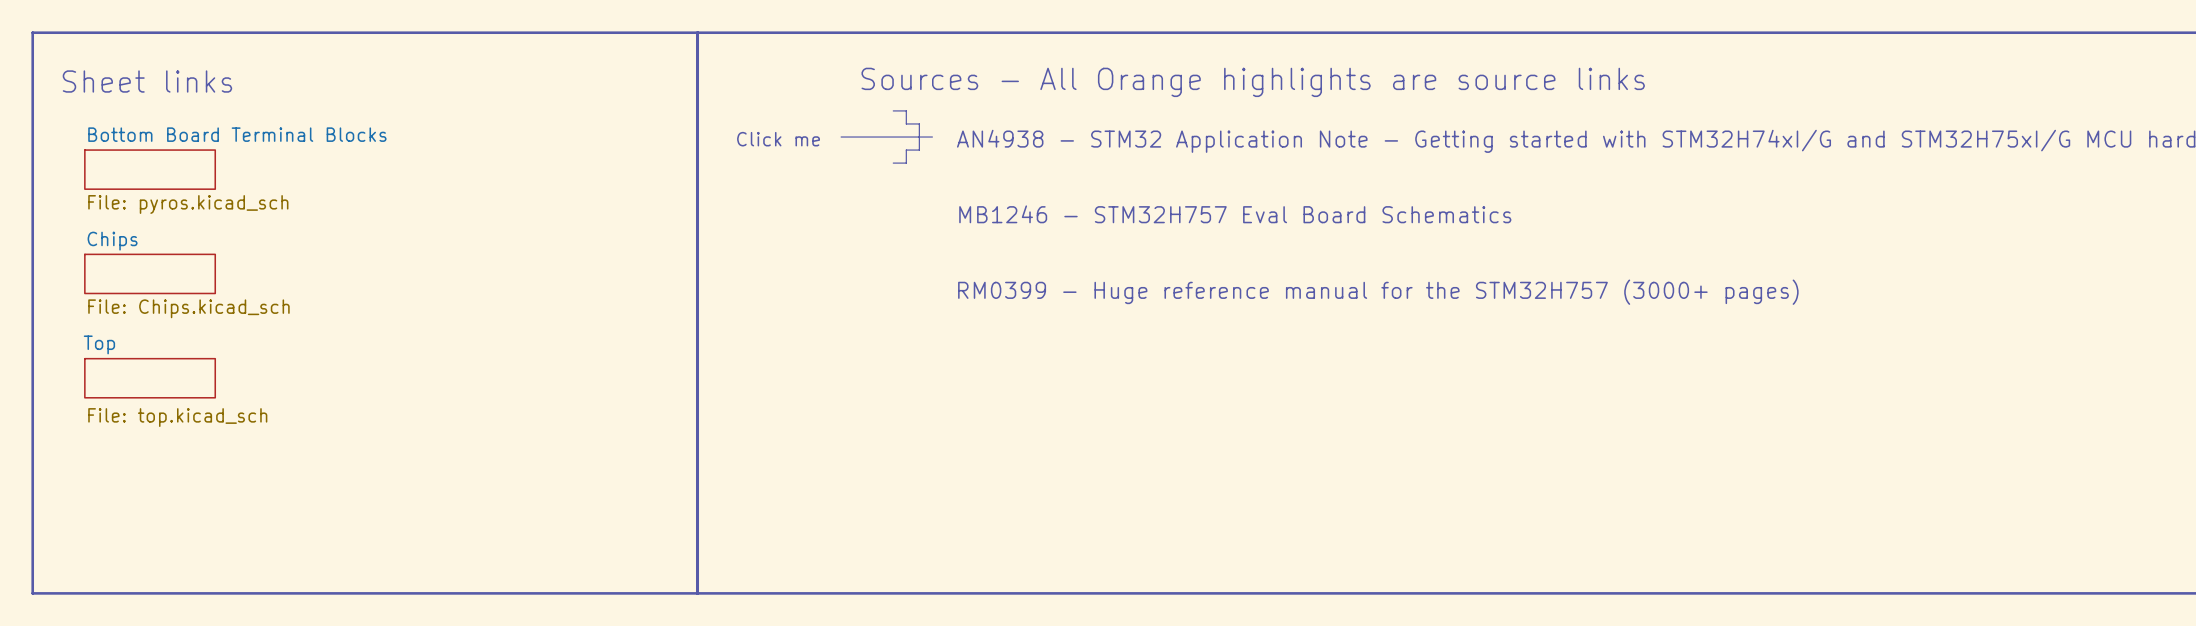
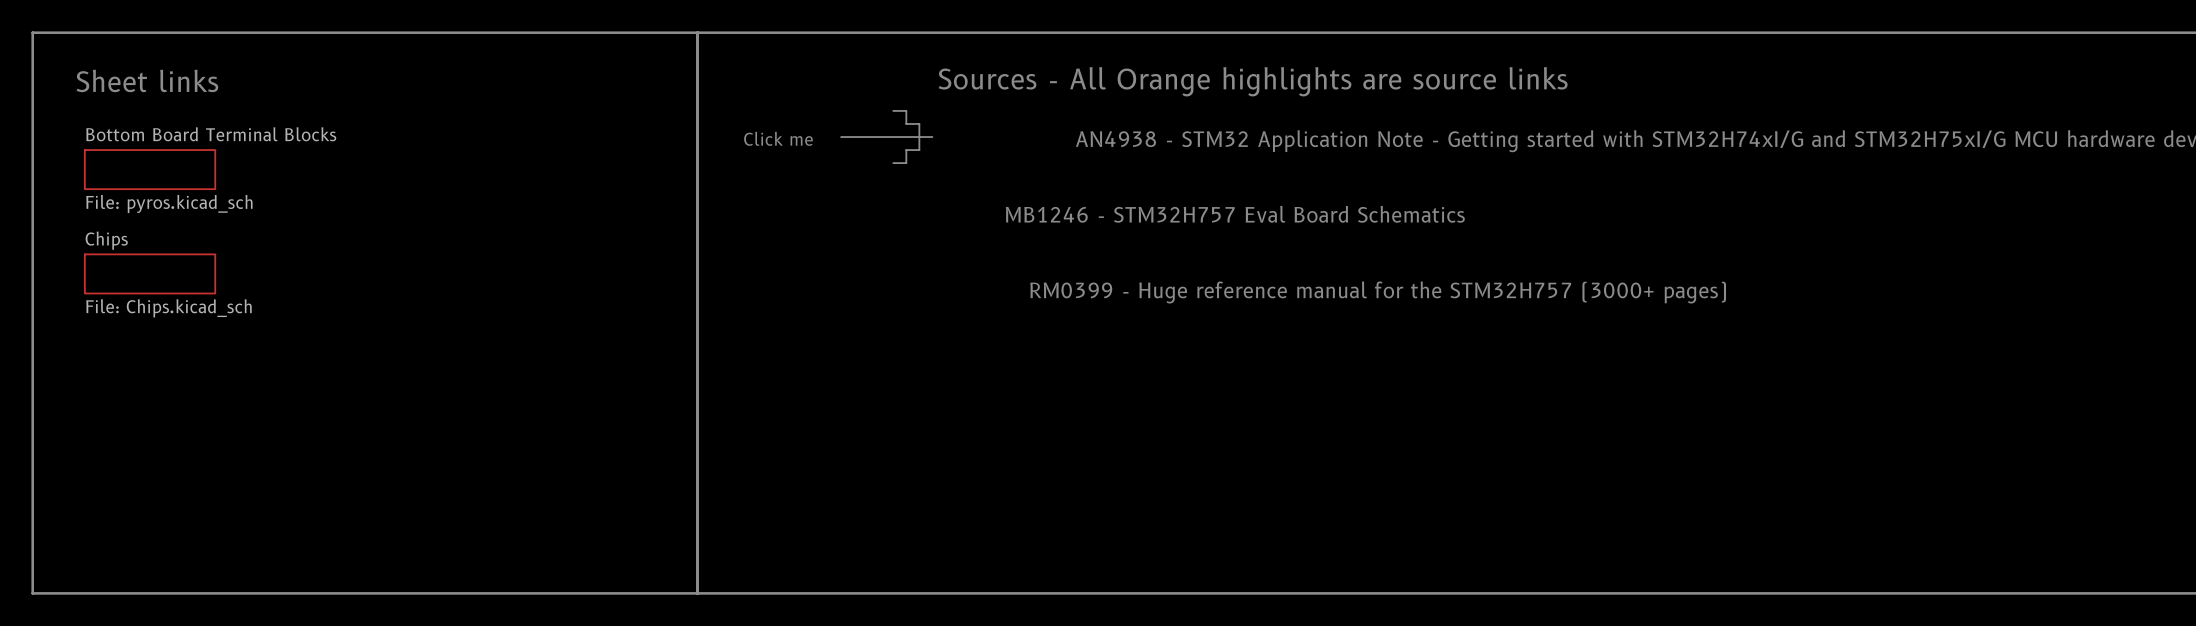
sheet Top: File: top.kicad_sch (150, 378) -> none

